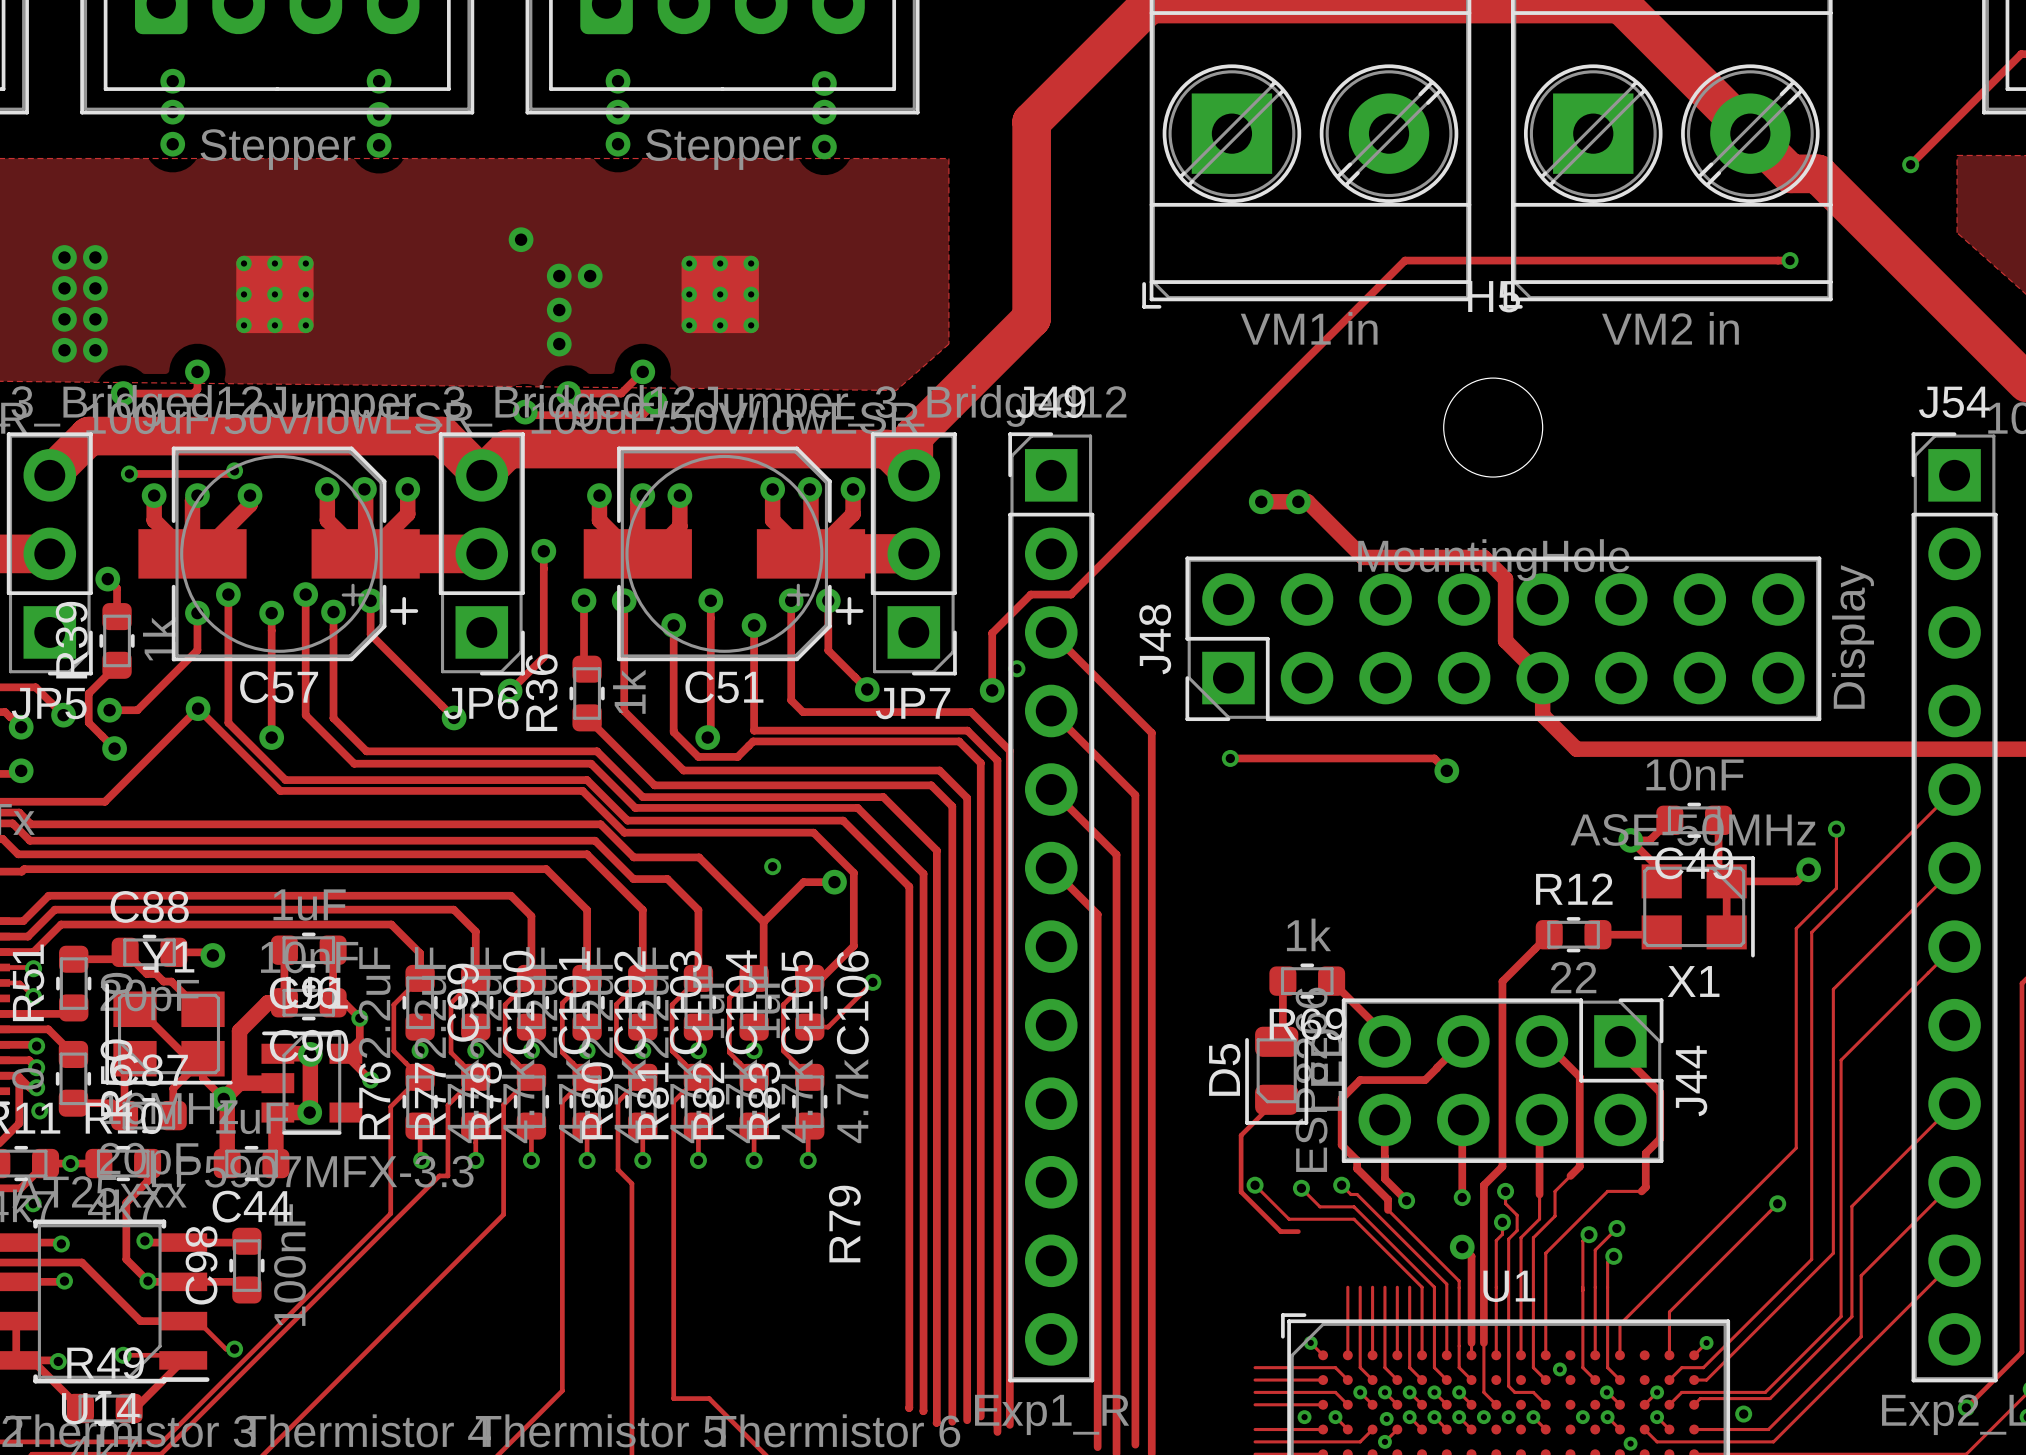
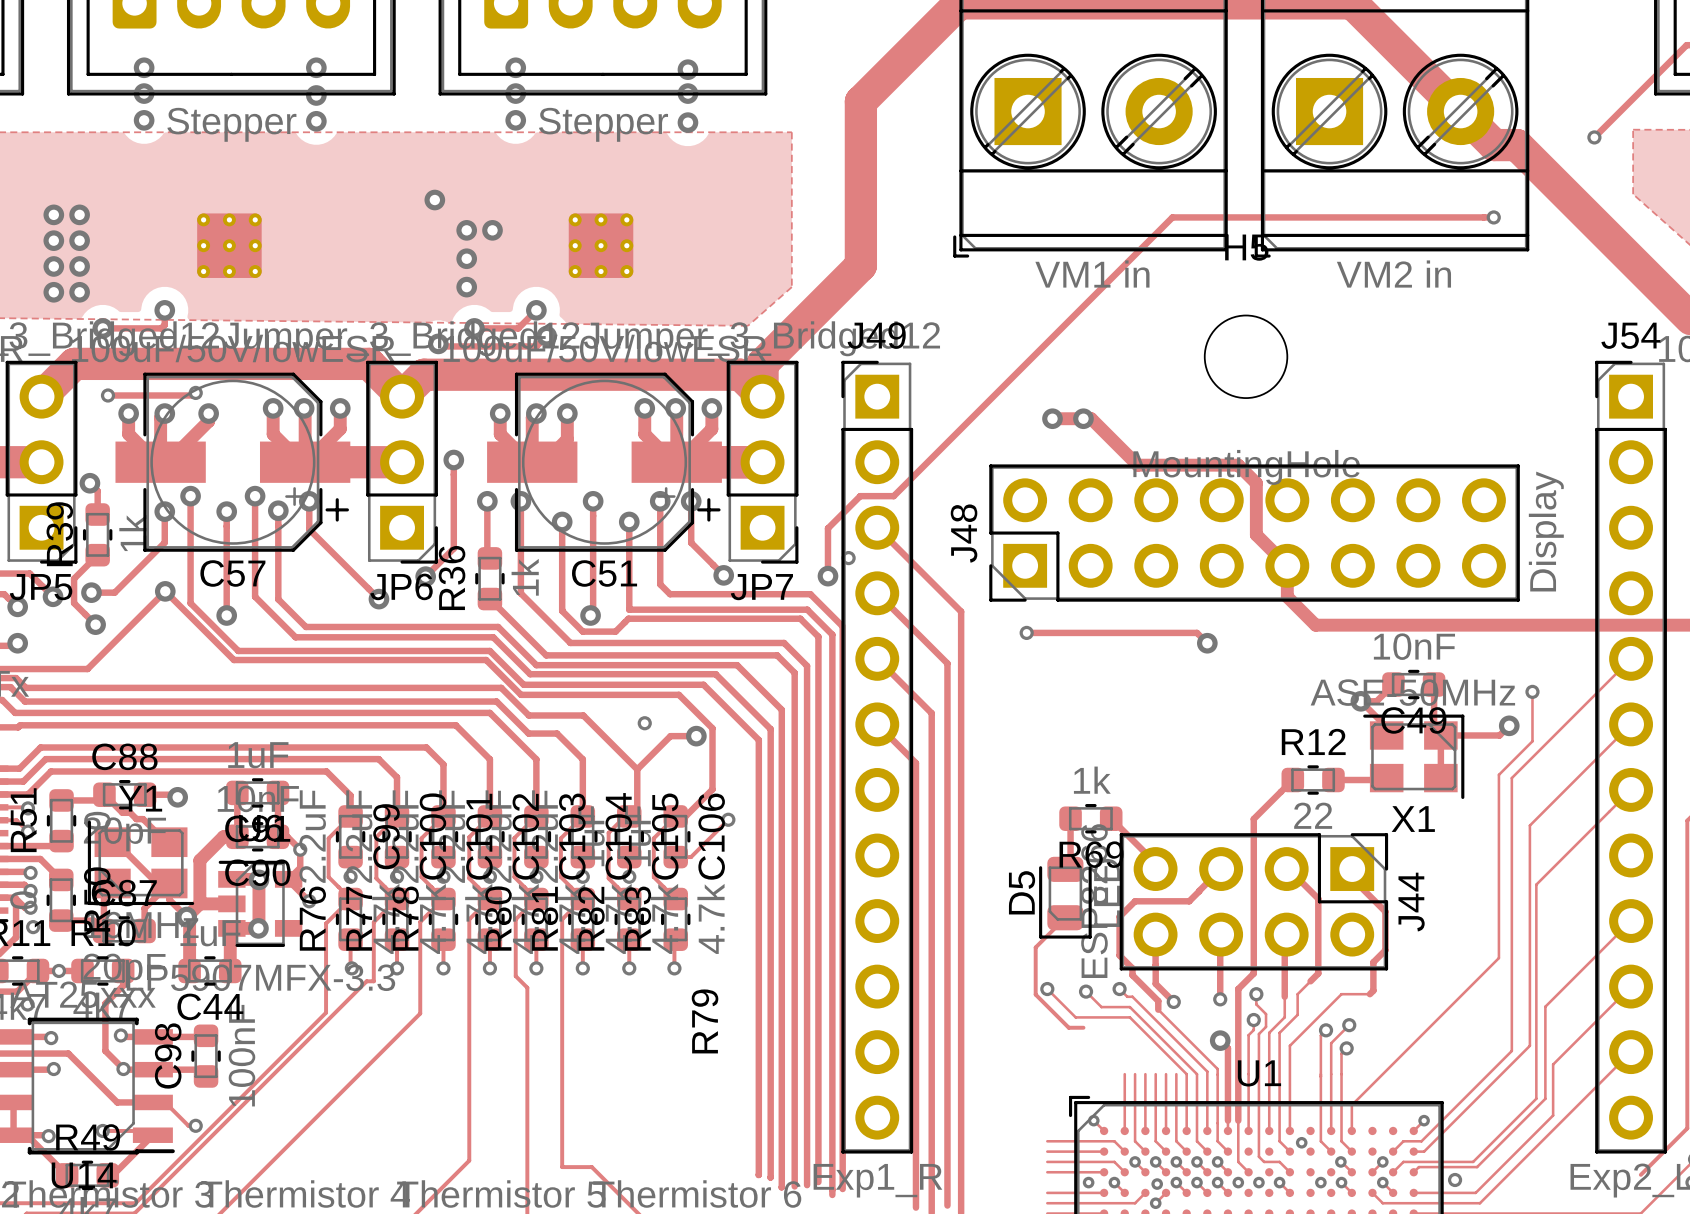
track: (1777, 1203) (1669, 1312) (1669, 1355) -> none
via: (1777, 1203) -> none
via: (1966, 1407) -> none
via: (1630, 1443) -> none

